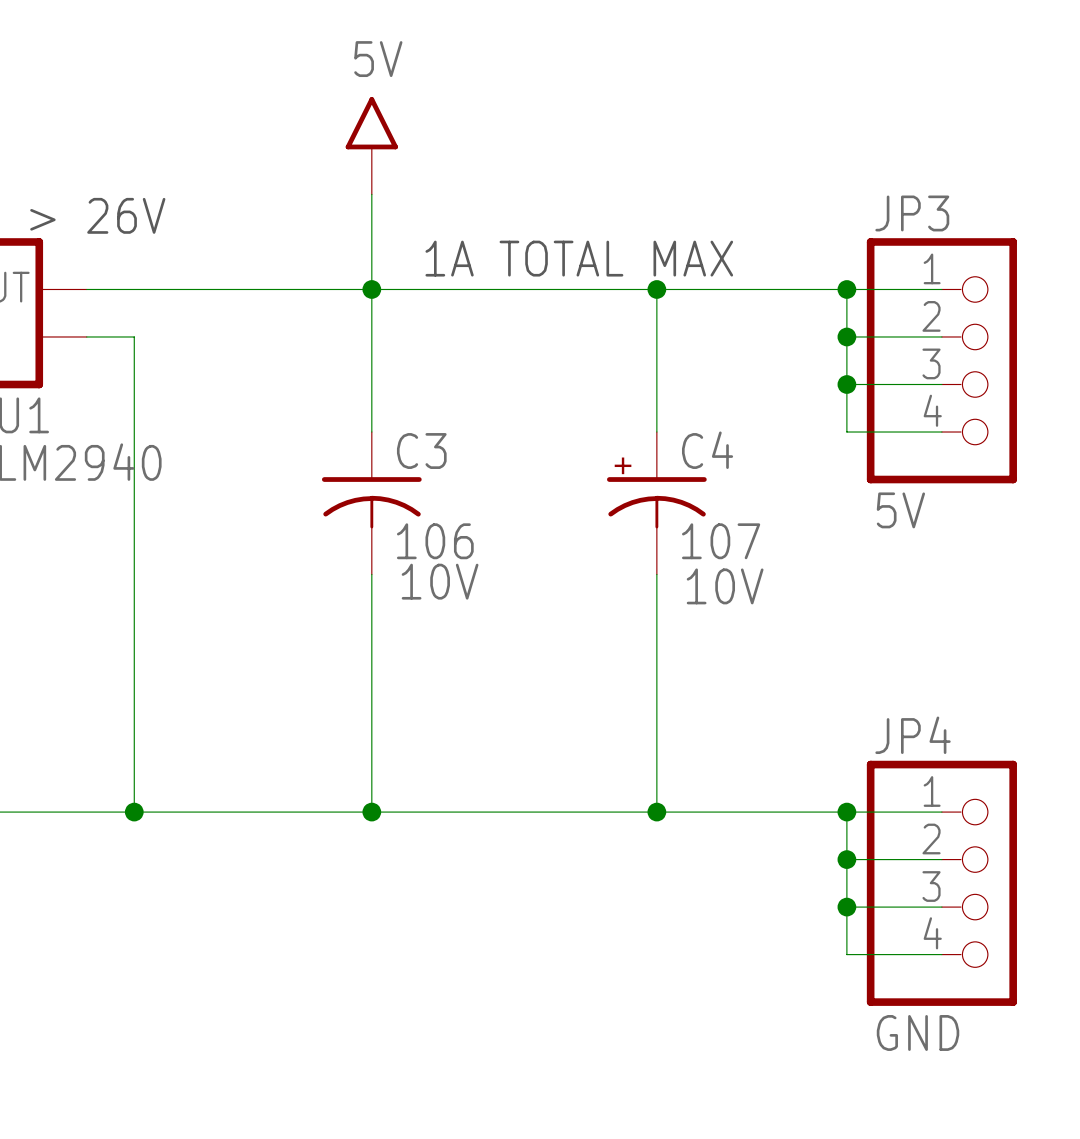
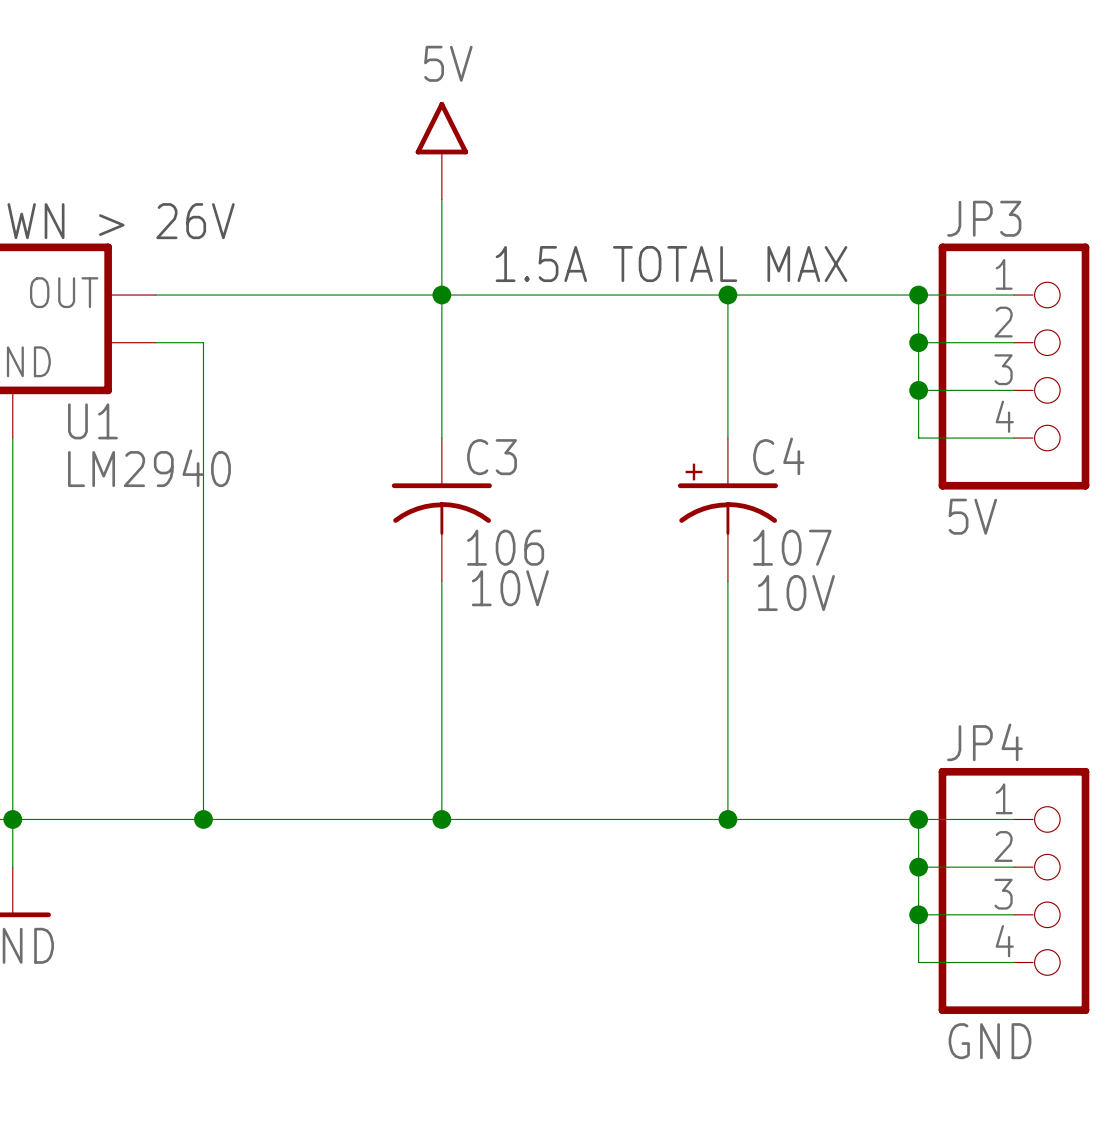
text: 1A TOTAL MAX (579, 258) -> 1.5A TOTAL MAX (671, 264)

